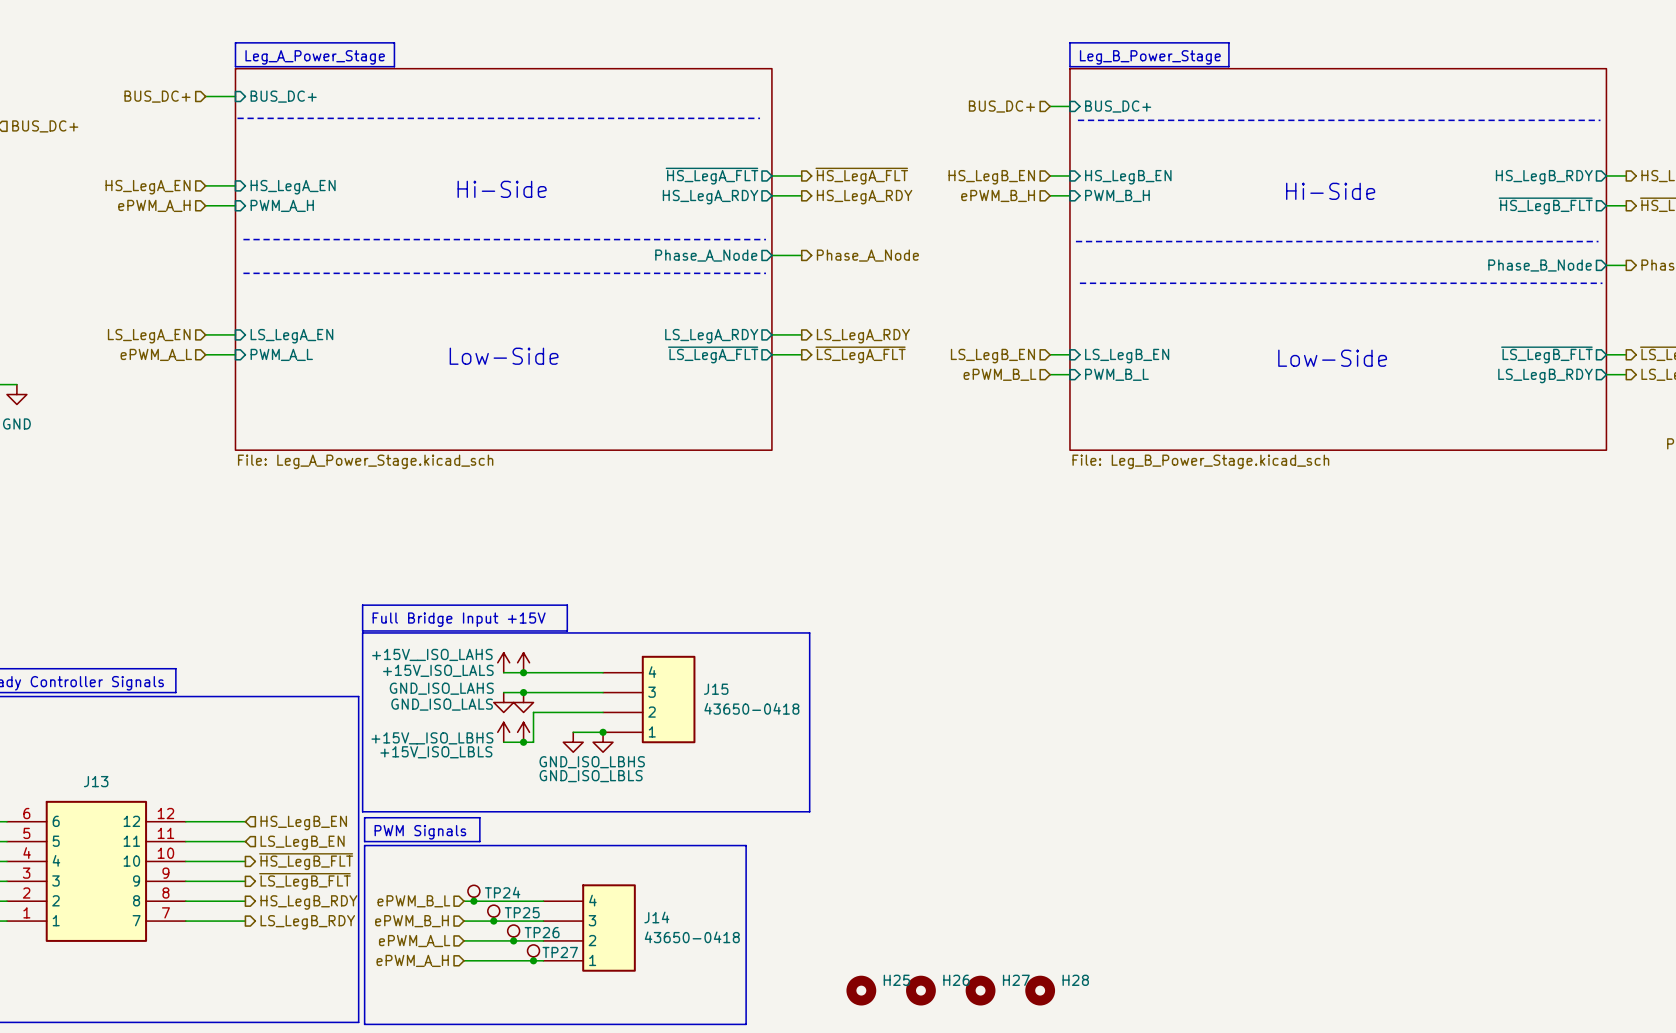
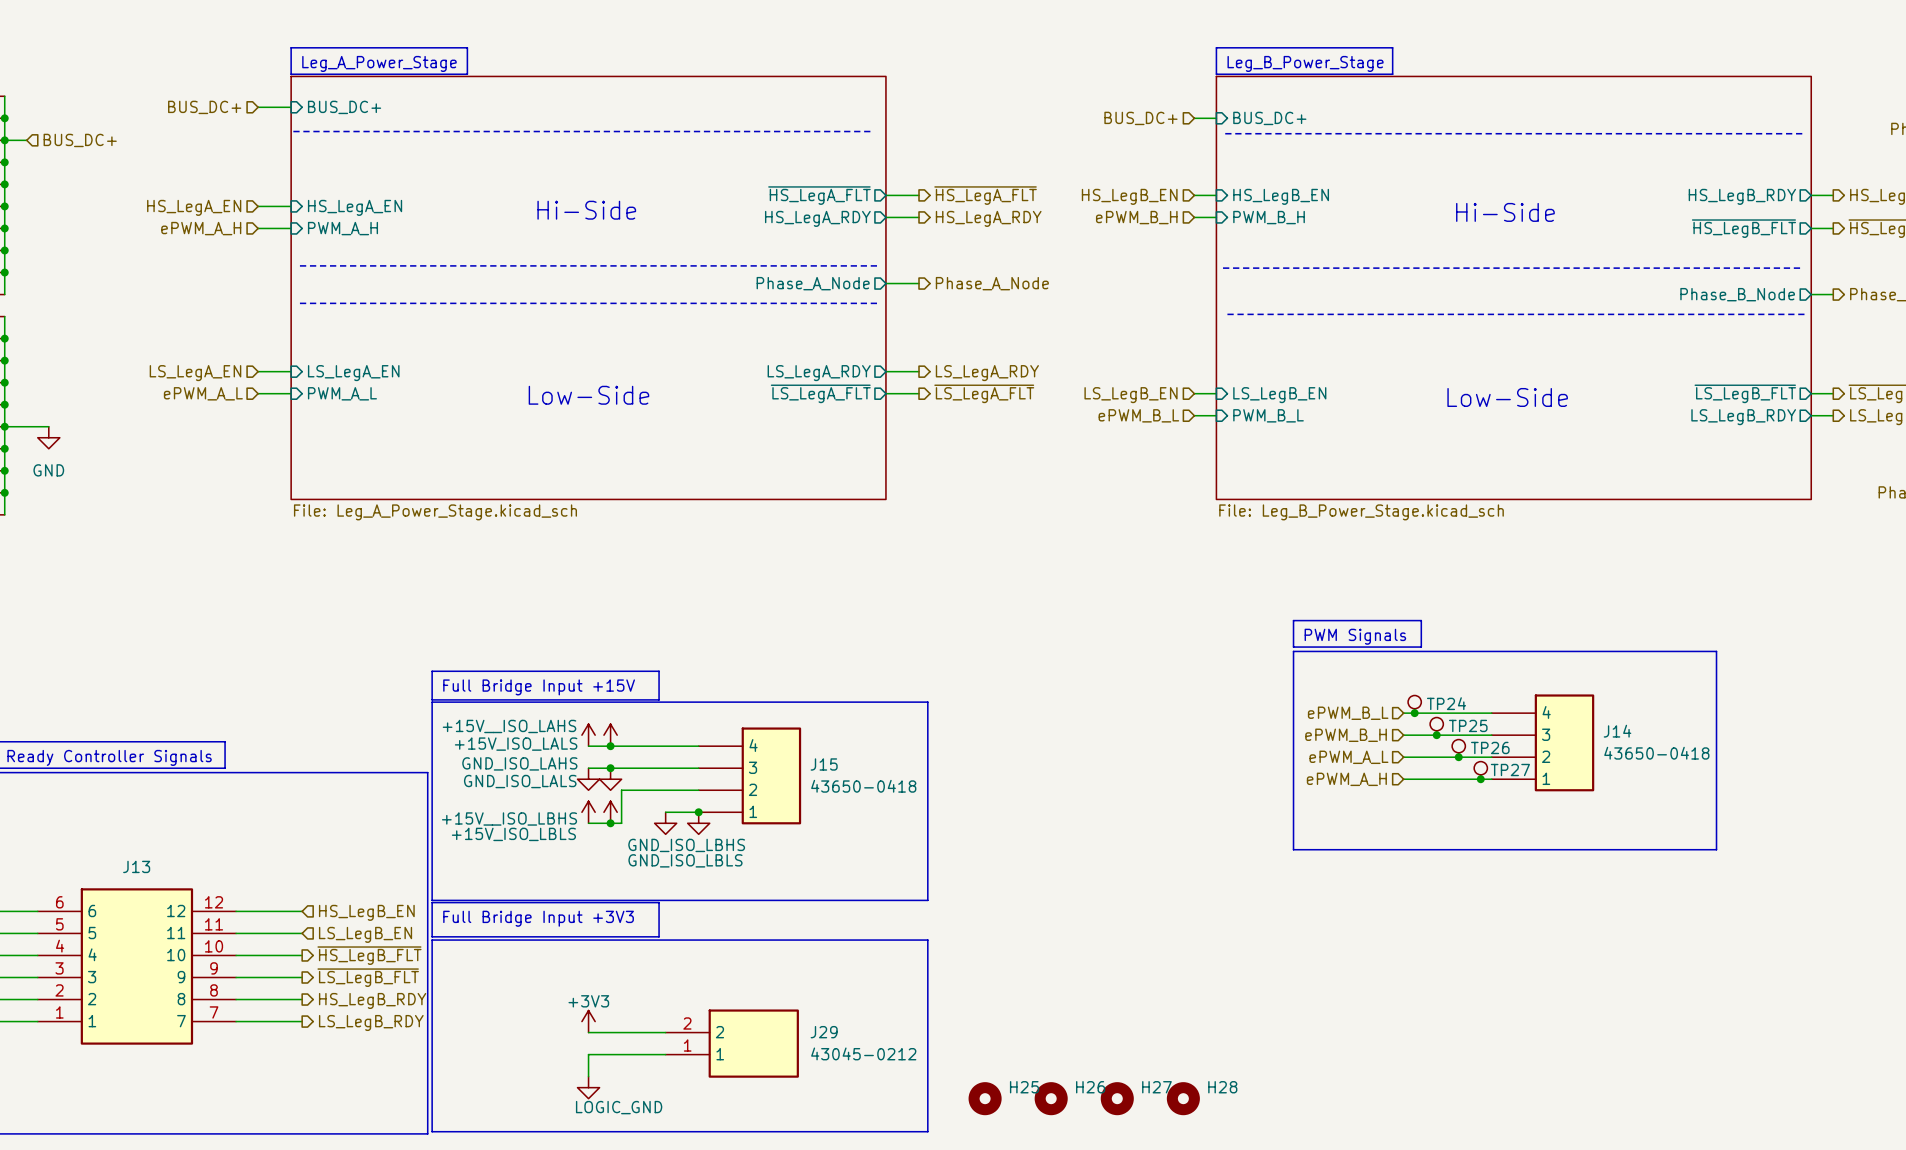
line: none -> (1293, 620) (1293, 647) (1421, 647) (1421, 620) (1293, 620)
text: none -> PWM Signals (1355, 636)
line: none -> (1293, 651) (1716, 651) (1716, 849) (1293, 849) (1293, 651)
wire: none -> (1403, 713) (1491, 713)
junction: none -> (1414, 713)
hierarchical label: none -> ePWM_B_L (1348, 713)
hierarchical label: none -> ePWM_B_H (1346, 735)
wire: none -> (1403, 735) (1491, 735)
junction: none -> (1436, 735)
hierarchical label: none -> ePWM_A_L (1348, 757)
wire: none -> (1403, 757) (1491, 757)
junction: none -> (1458, 757)
hierarchical label: none -> ePWM_A_H (1346, 779)
wire: none -> (1403, 779) (1491, 779)
junction: none -> (1480, 779)
line: none -> (432, 902) (432, 936) (659, 936) (659, 902) (432, 902)
line: (364, 817) (364, 841) (479, 841) (479, 817) (364, 817) -> none
text: PWM Signals (420, 832) -> Full Bridge Input +3V3 (538, 918)
line: (364, 845) (746, 845) (746, 1024) (364, 1024) (364, 845) -> (432, 940) (432, 1131) (927, 1131) (927, 940) (432, 940)
TP24 position: (473, 893) -> (1414, 704)
hierarchical label: ePWM_B_L (413, 901) -> none
wire: (463, 901) (543, 901) -> none
junction: (473, 901) -> none
TP25 position: (493, 913) -> (1436, 726)
hierarchical label: ePWM_B_H (412, 921) -> none
wire: (463, 921) (543, 921) -> none
junction: (493, 921) -> none
power symbol: none -> +3V3 (588, 1021)
J14 position: (589, 928) -> (1543, 742)
wire: none -> (588, 1032) (665, 1032)
TP26 position: (513, 932) -> (1458, 748)
wire: (463, 940) (543, 940) -> none
junction: (513, 940) -> none
J29: none -> 43045-0212 (732, 1043)
hierarchical label: ePWM_A_L (414, 941) -> none
wire: none -> (665, 1054) (588, 1054) (588, 1076)
TP27 position: (533, 952) -> (1480, 770)
hierarchical label: ePWM_A_H (412, 960) -> none
wire: (463, 960) (543, 960) -> none
junction: (533, 960) -> none
power symbol: none -> LOGIC_GND (588, 1087)

